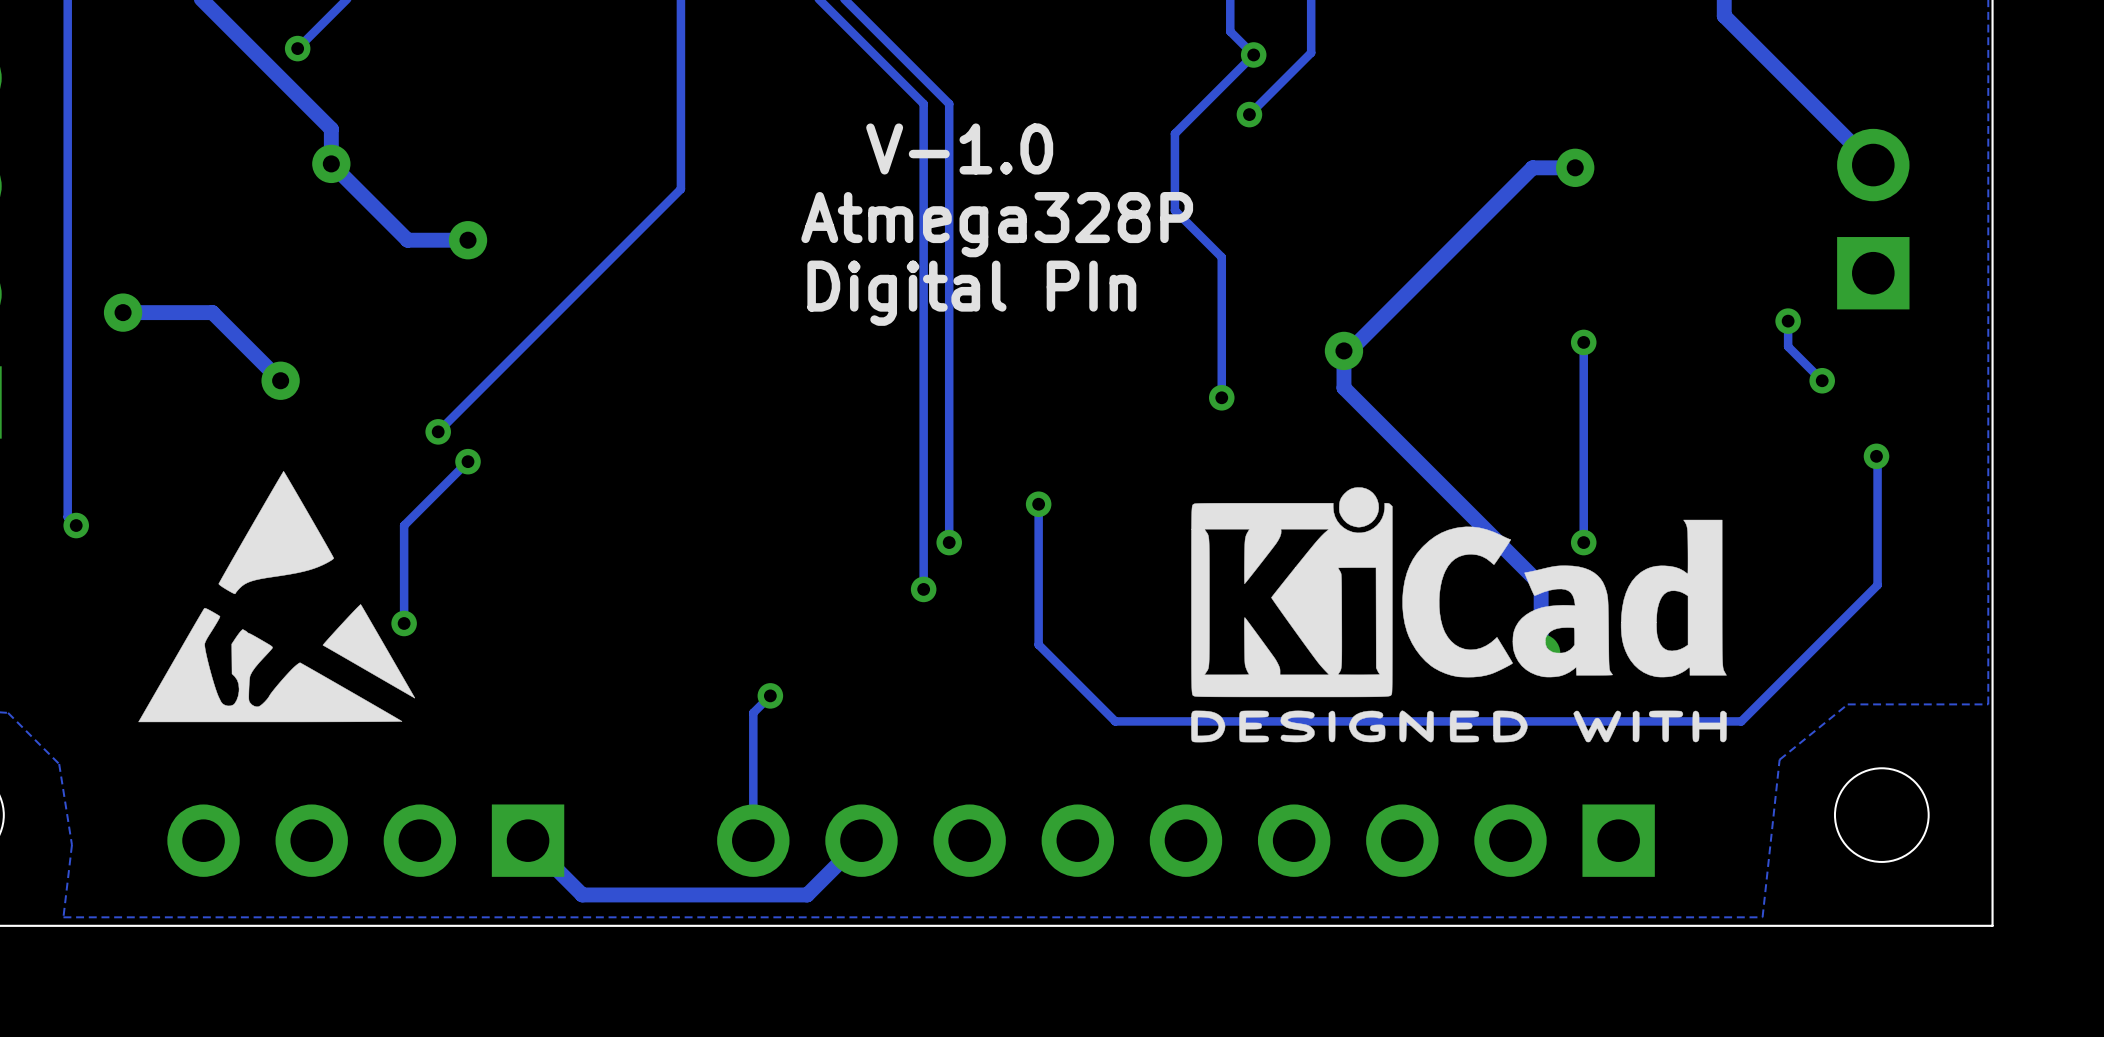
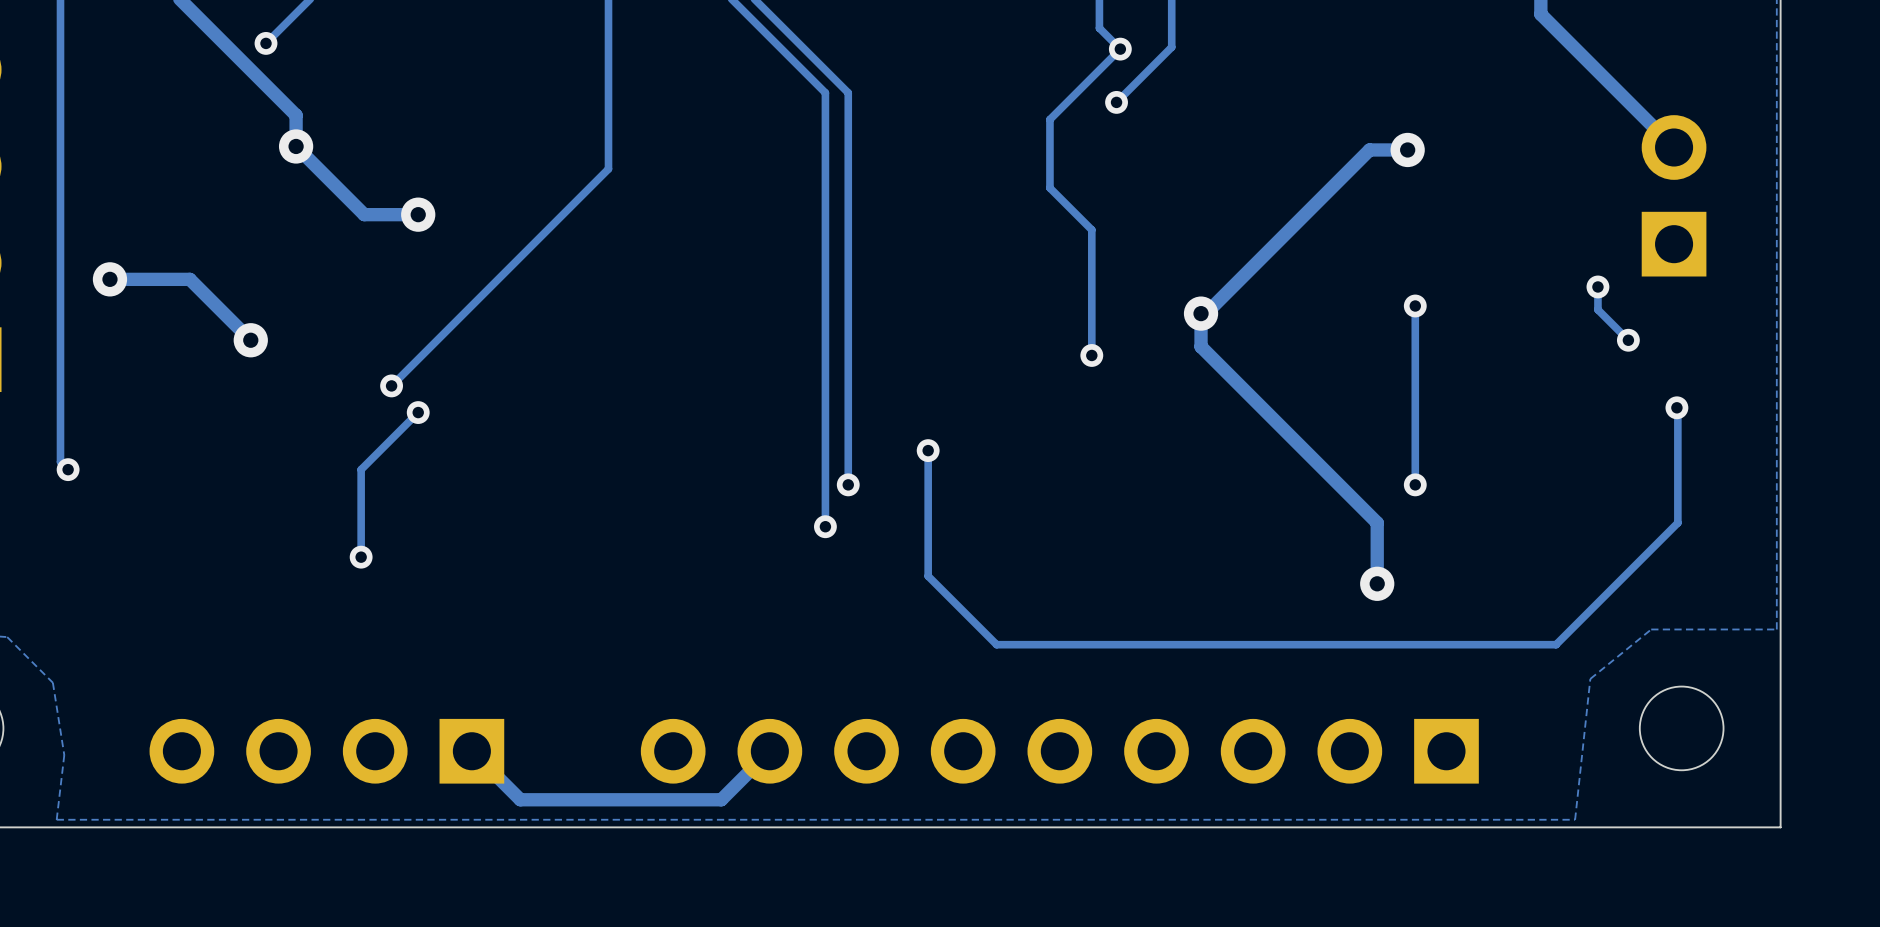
text: V-1.0 (959, 148) -> none
text: Atmega328P (997, 224) -> none
text: Digital PIn (971, 293) -> none
drawing: [138, 471, 416, 723] -> none
drawing: [1191, 487, 1727, 743] -> none
track: (770, 695) (753, 712) (753, 840) -> none
via: (770, 695) -> none

